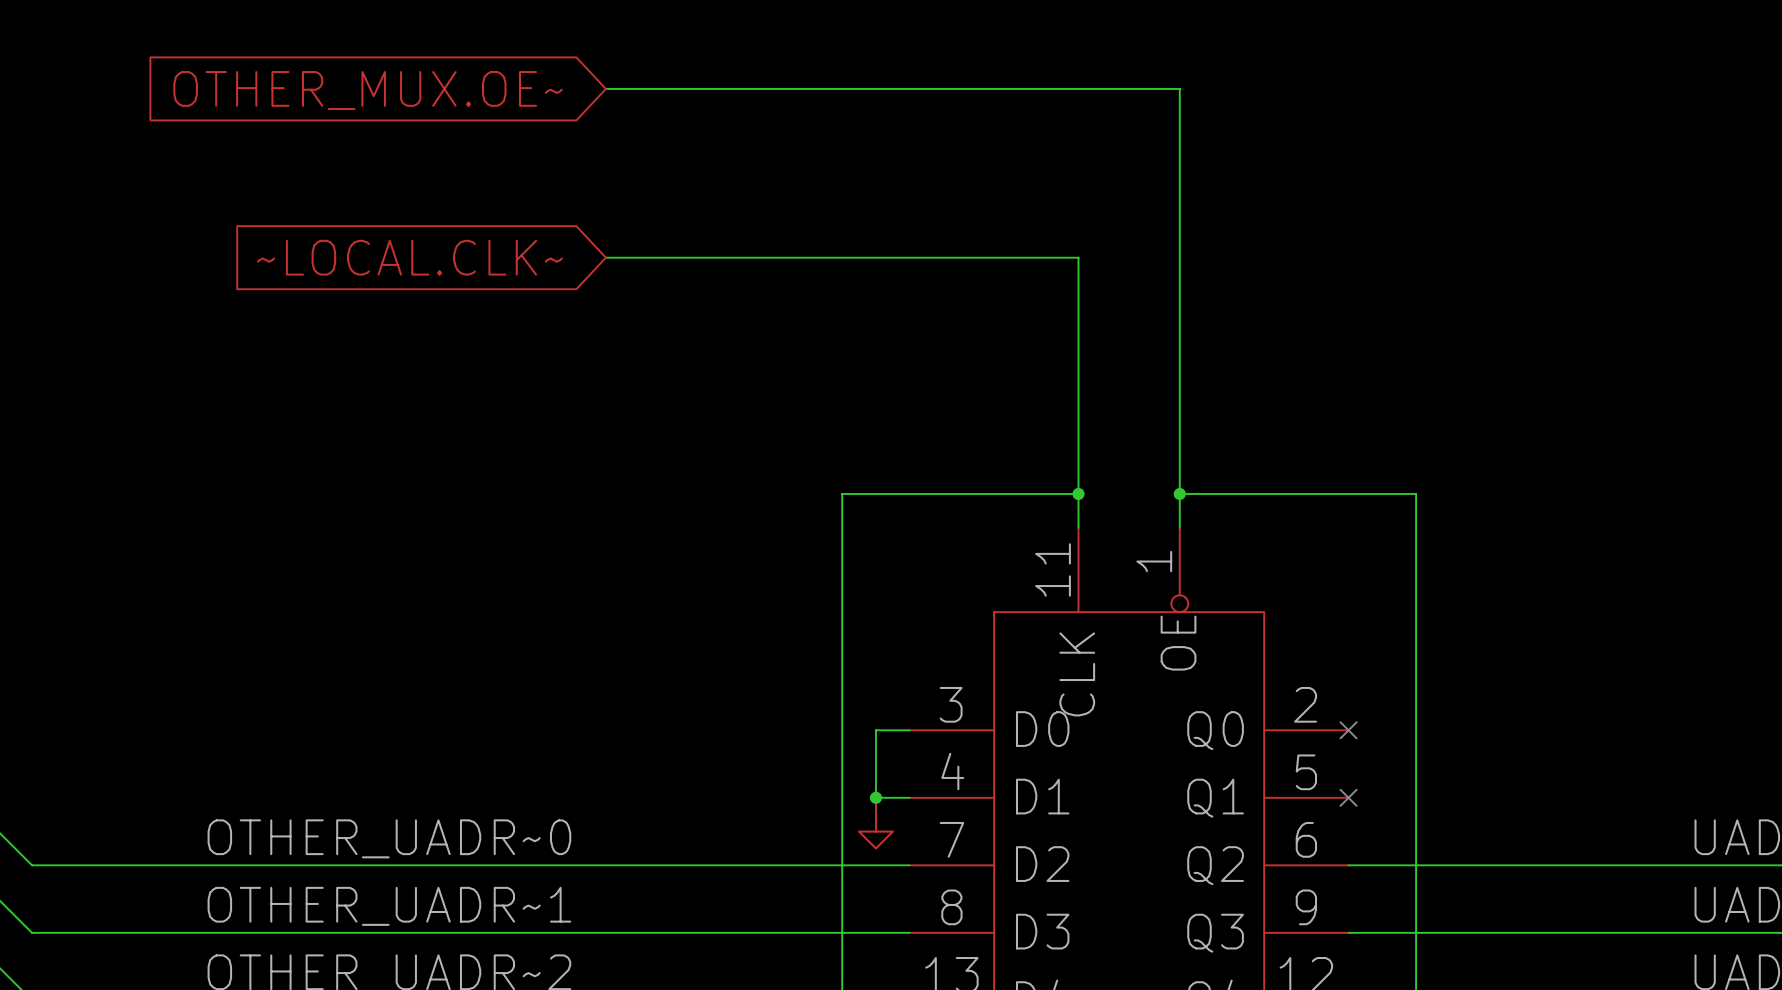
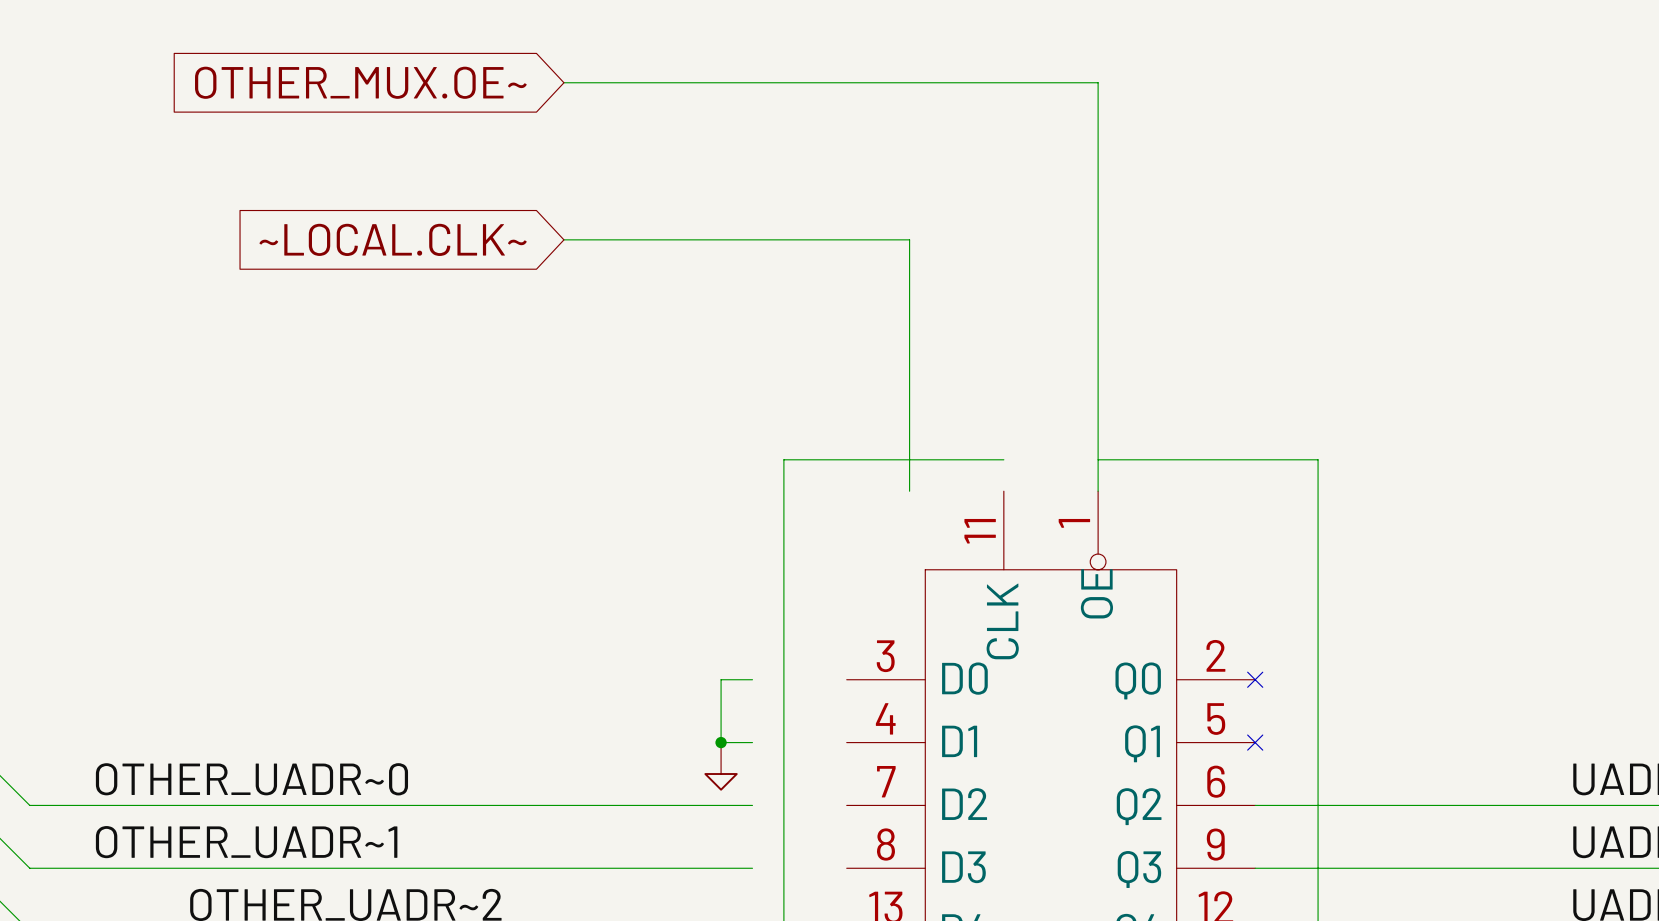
wire: (977, 257) (1078, 257) (1078, 527) -> (909, 239) (909, 491)
junction: (1078, 494) -> none
junction: (1179, 494) -> none
wire: (909, 730) (875, 730) (875, 797) (909, 797) -> (752, 679) (721, 679) (721, 742) (752, 742)
junction: none -> (721, 742)
junction: (875, 797) -> none
power symbol position: (875, 823) -> (721, 766)
label position: OTHER_UADR~0 (389, 838) -> OTHER_UADR~0 (251, 779)
wire: (808, 865) (909, 865) -> none
label position: OTHER_UADR~1 (389, 906) -> OTHER_UADR~1 (246, 842)
wire: (808, 932) (909, 932) -> none

